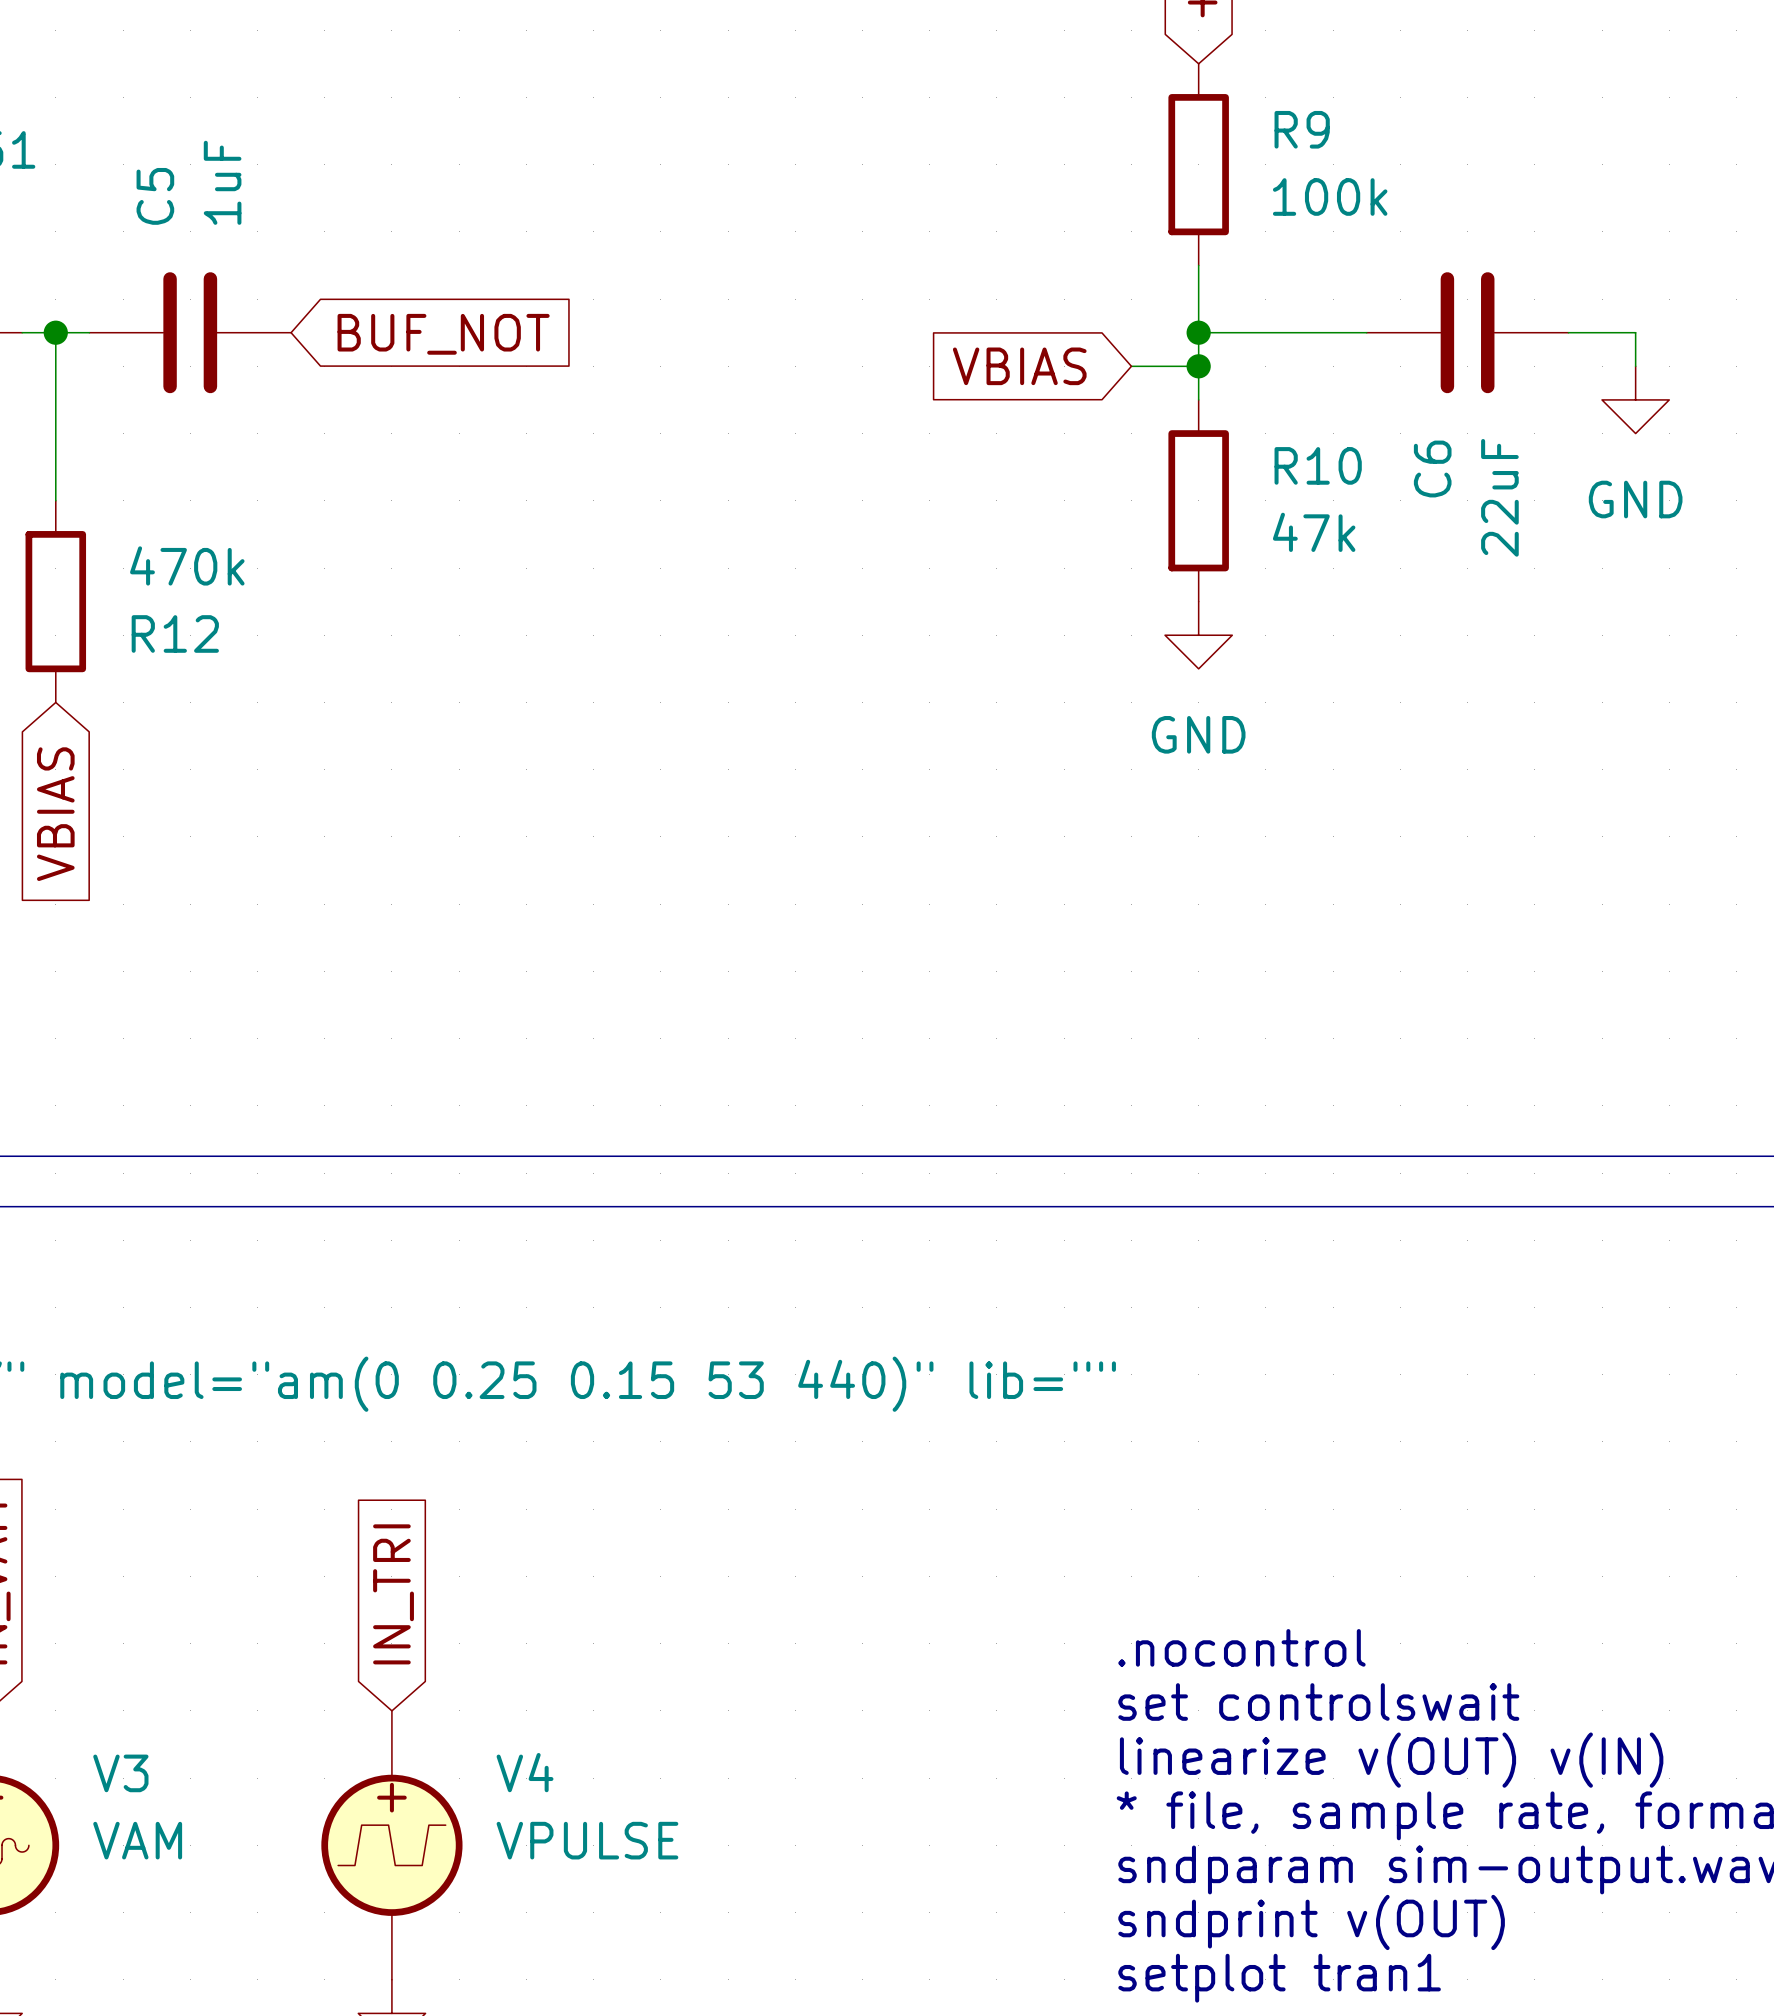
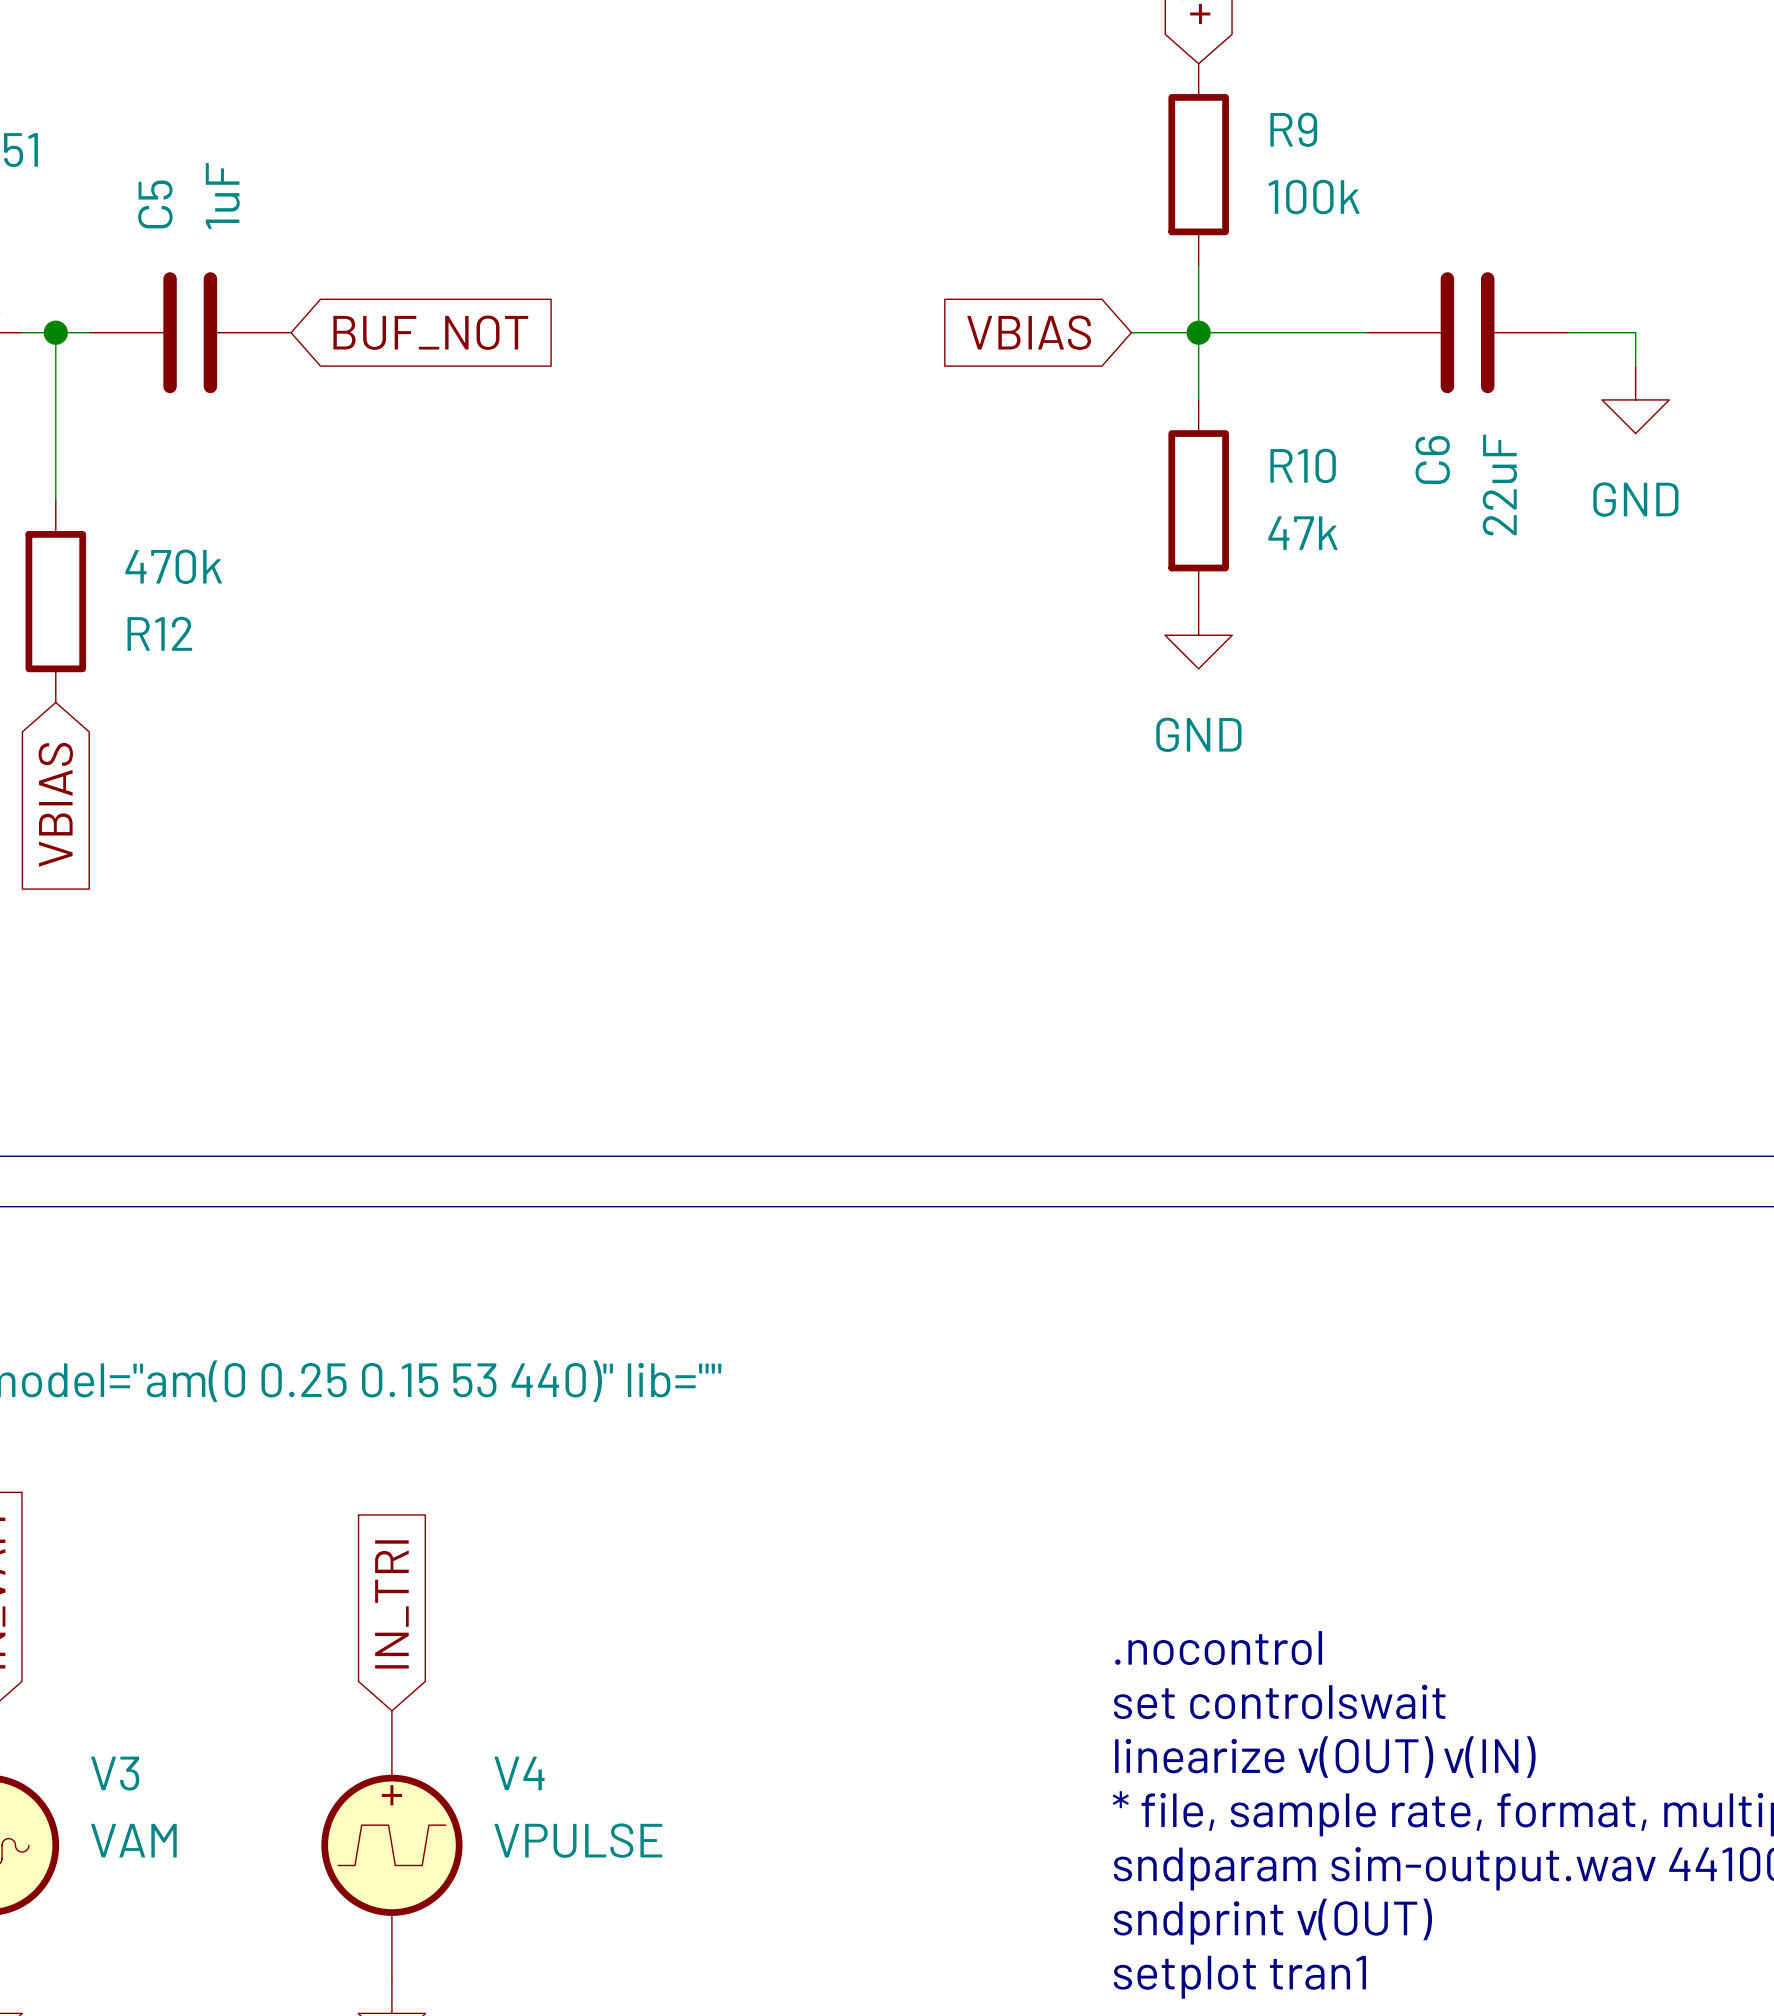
global label position: VBIAS (1019, 366) -> VBIAS (1029, 332)
wire: (1131, 366) (1198, 366) -> (1131, 332) (1198, 332)
junction: (1198, 366) -> none

